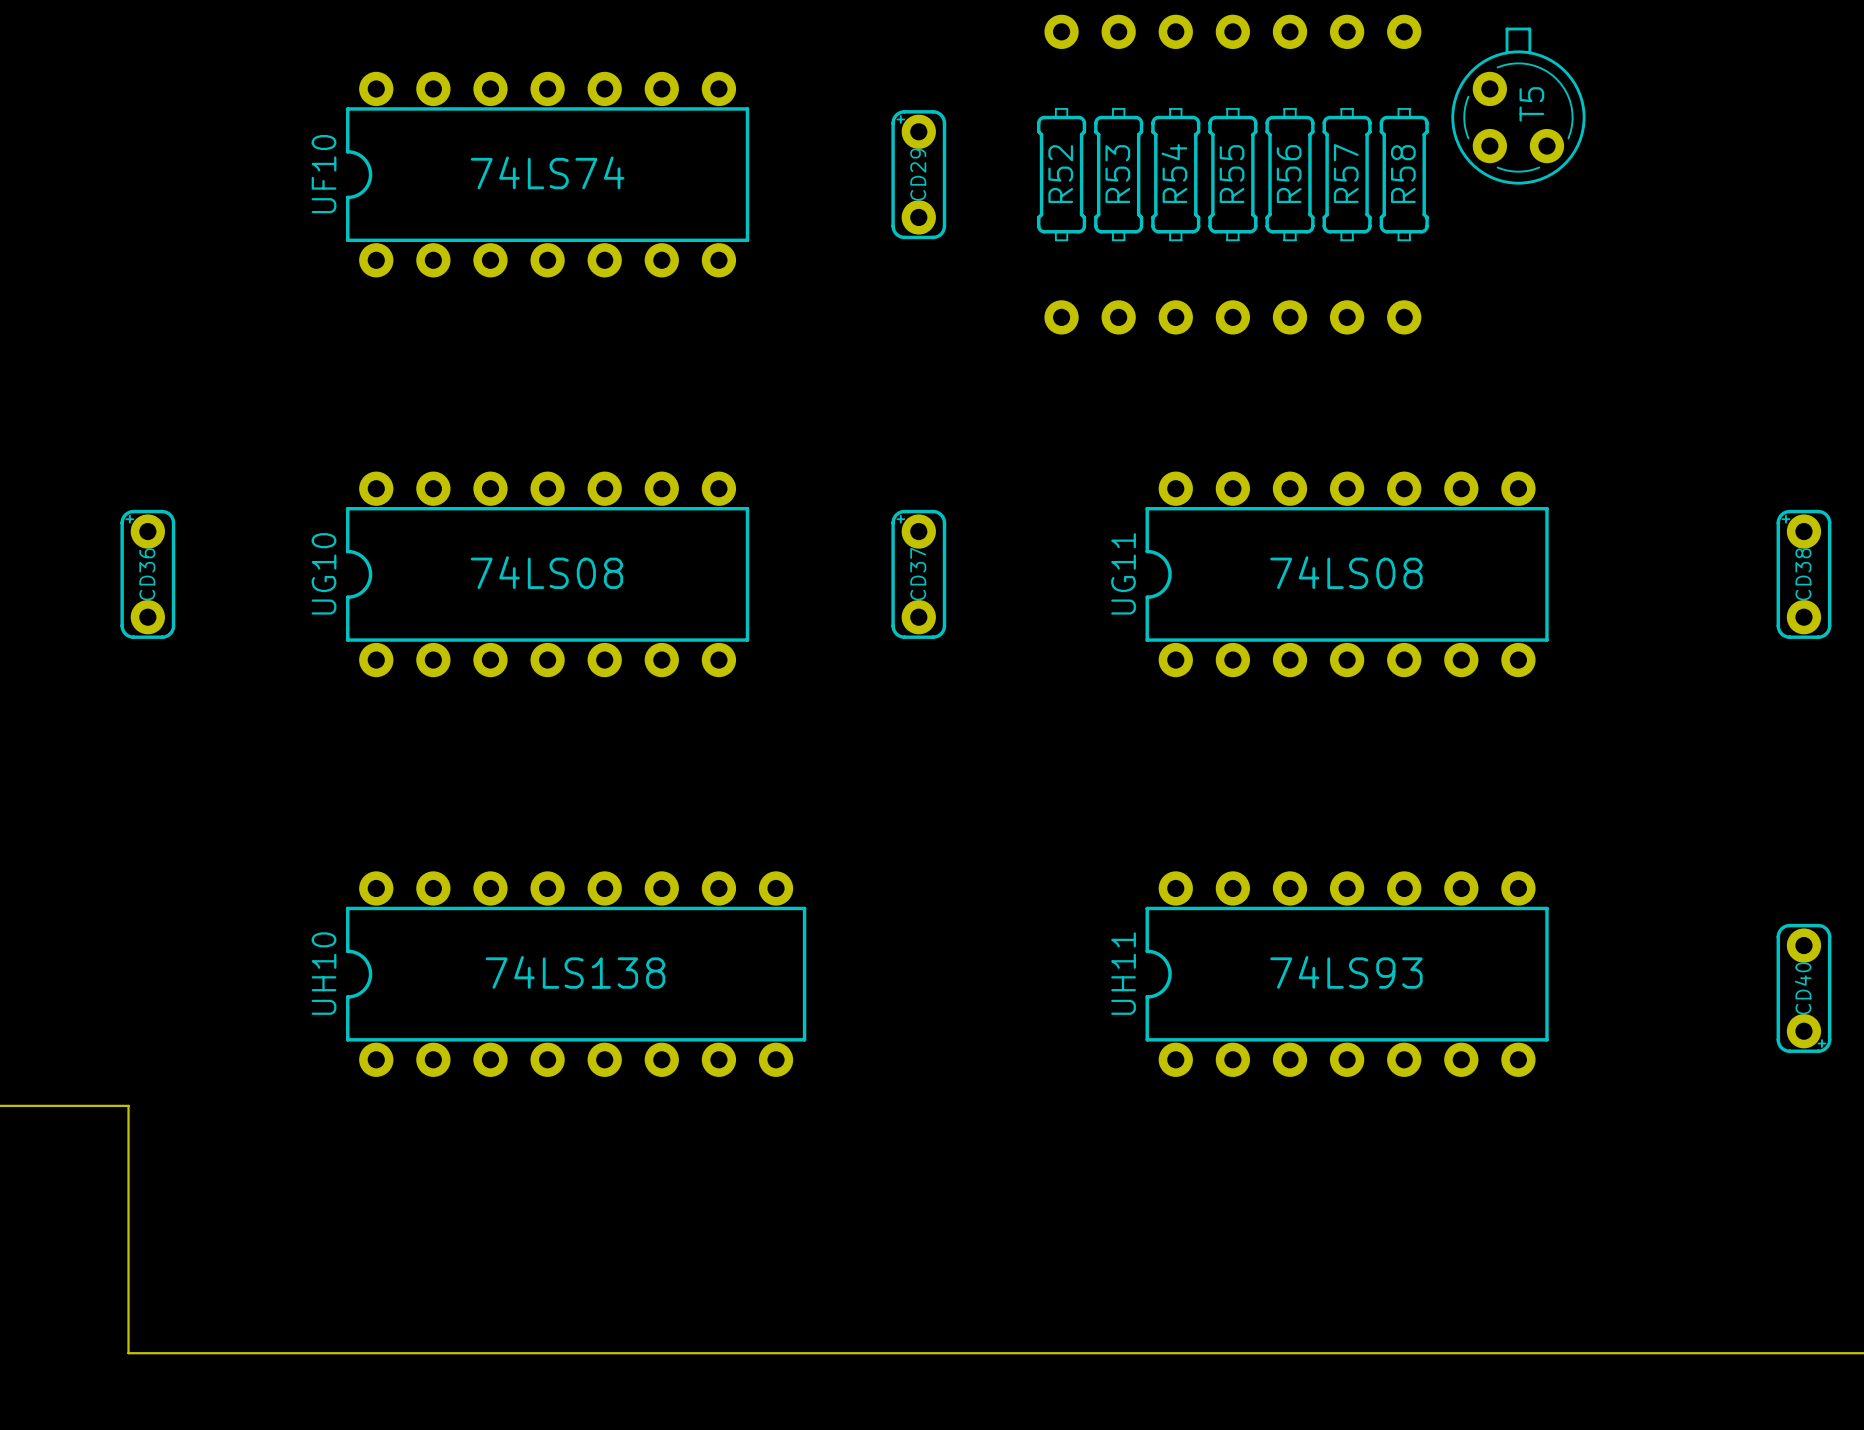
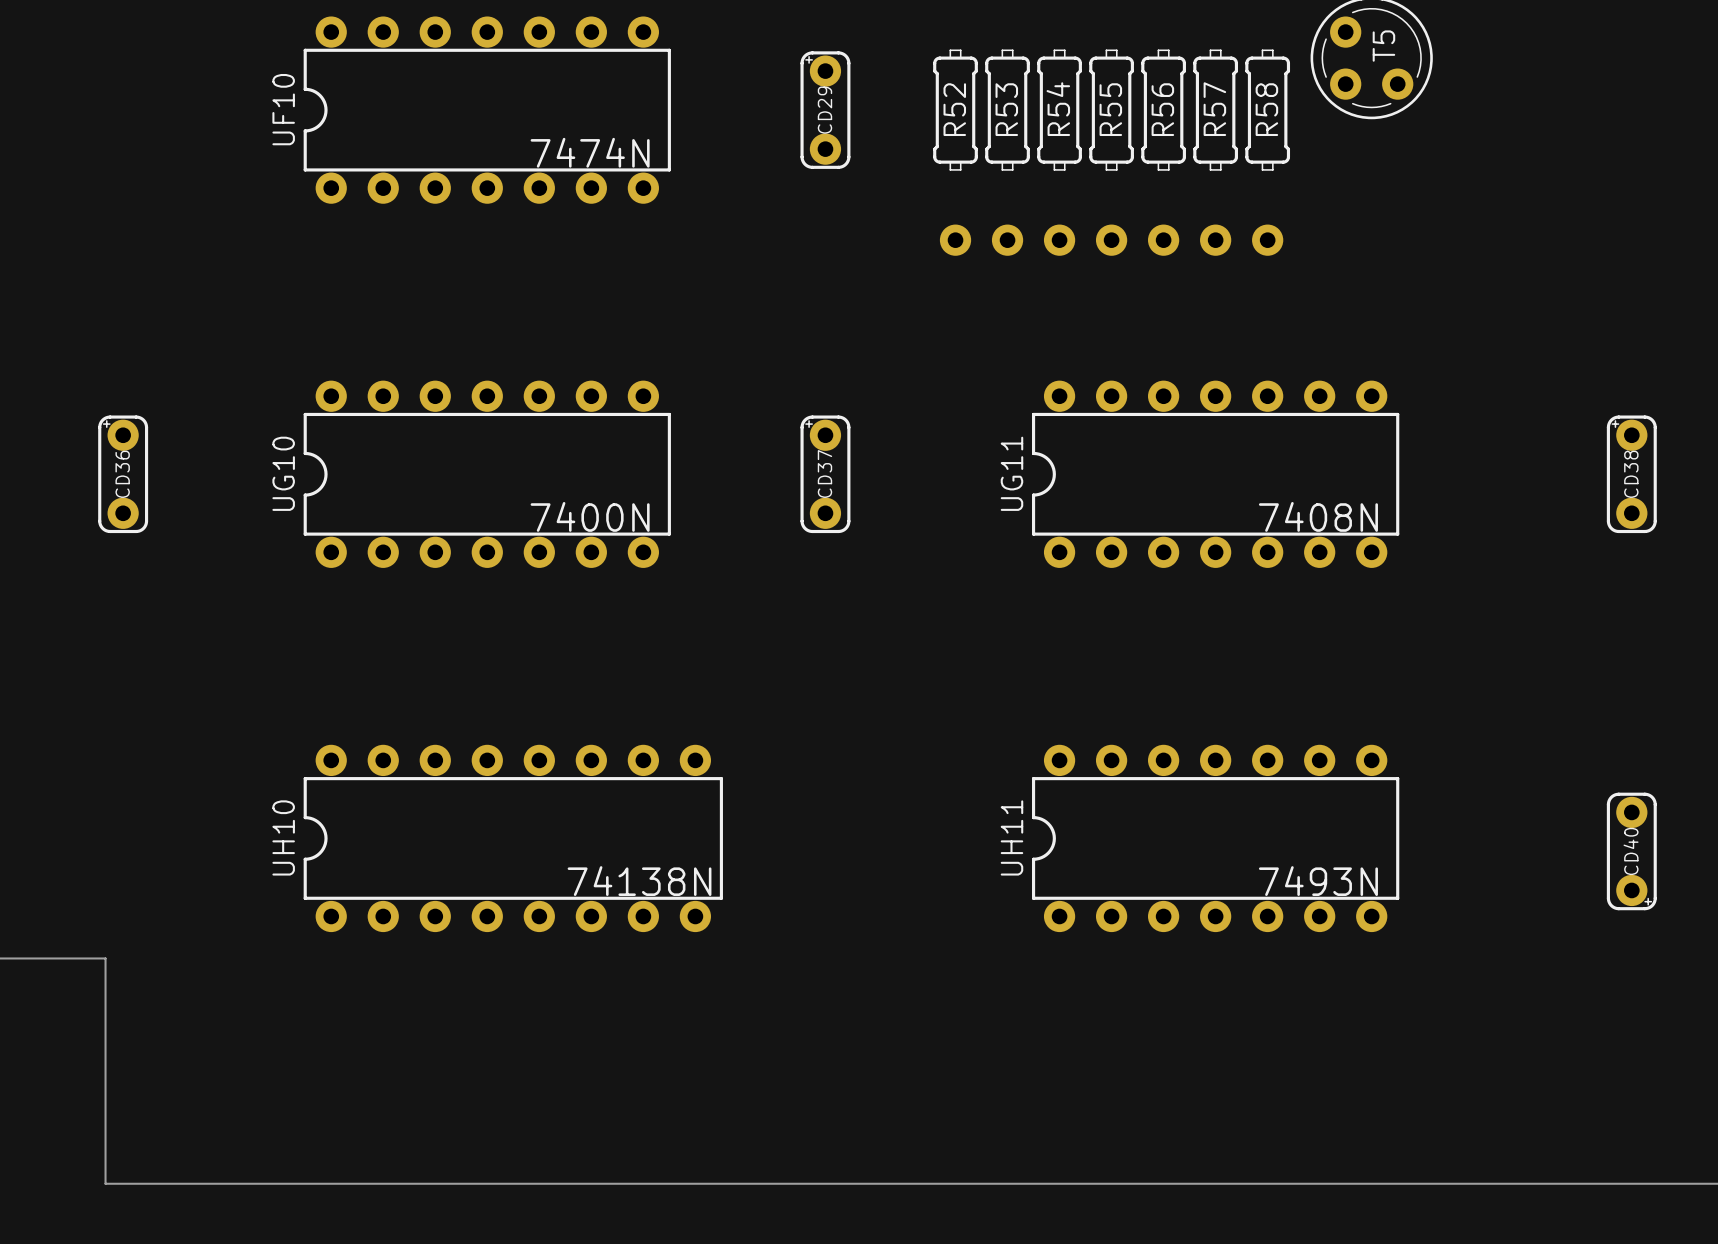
UF10 value: 74LS74 (547, 172) -> 7474N (590, 152)
UG10 value: 74LS08 (546, 572) -> 7400N (590, 516)
UG11 value: 74LS08 (1346, 572) -> 7408N (1318, 516)
UH10 value: 74LS138 (575, 972) -> 74138N (639, 881)
UH11 value: 74LS93 (1346, 972) -> 7493N (1318, 881)

